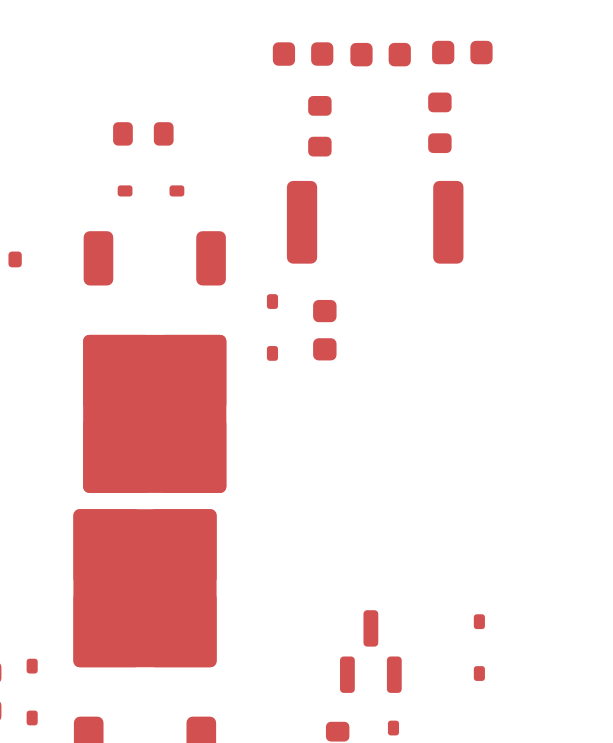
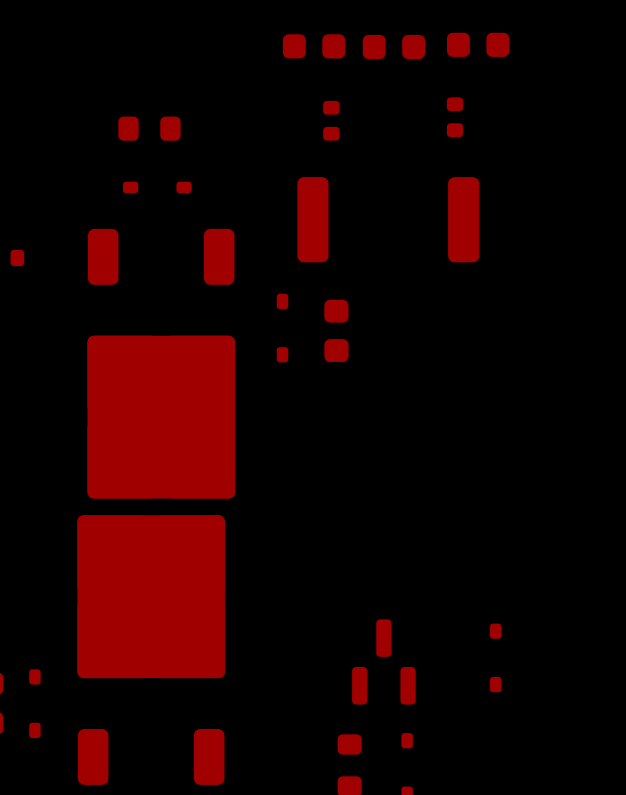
part footprint: [428, 92, 452, 154] -> [446, 97, 464, 138]
part footprint: [308, 96, 332, 157] -> [323, 100, 340, 141]

